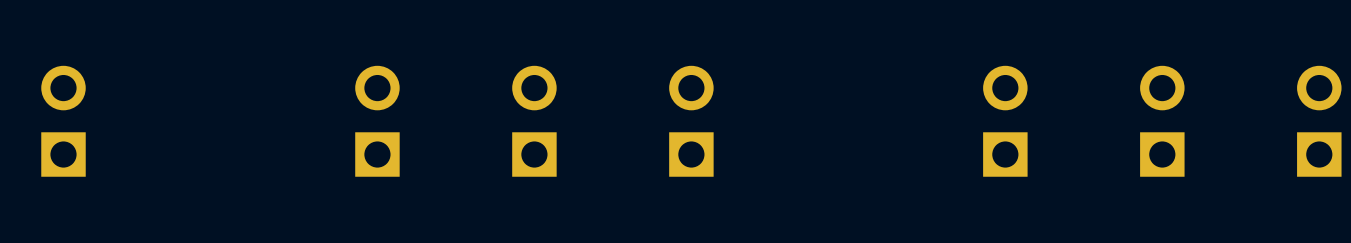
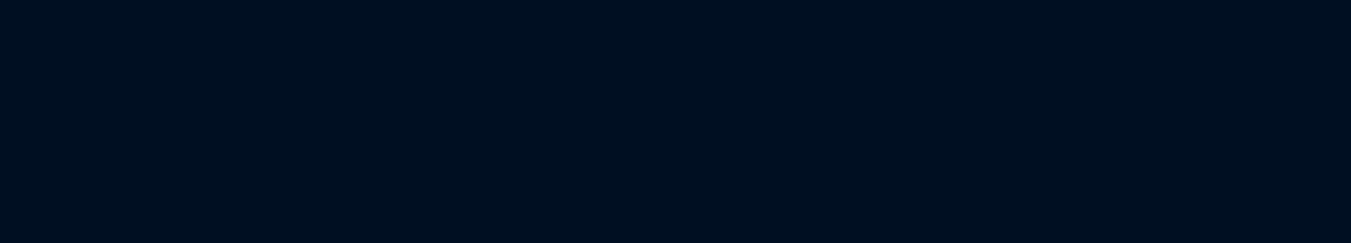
part: (63, 121) -> none
part: (377, 121) -> none
part: (534, 121) -> none
part: (691, 121) -> none
part: (1005, 121) -> none
part: (1162, 121) -> none
part: (1319, 121) -> none

